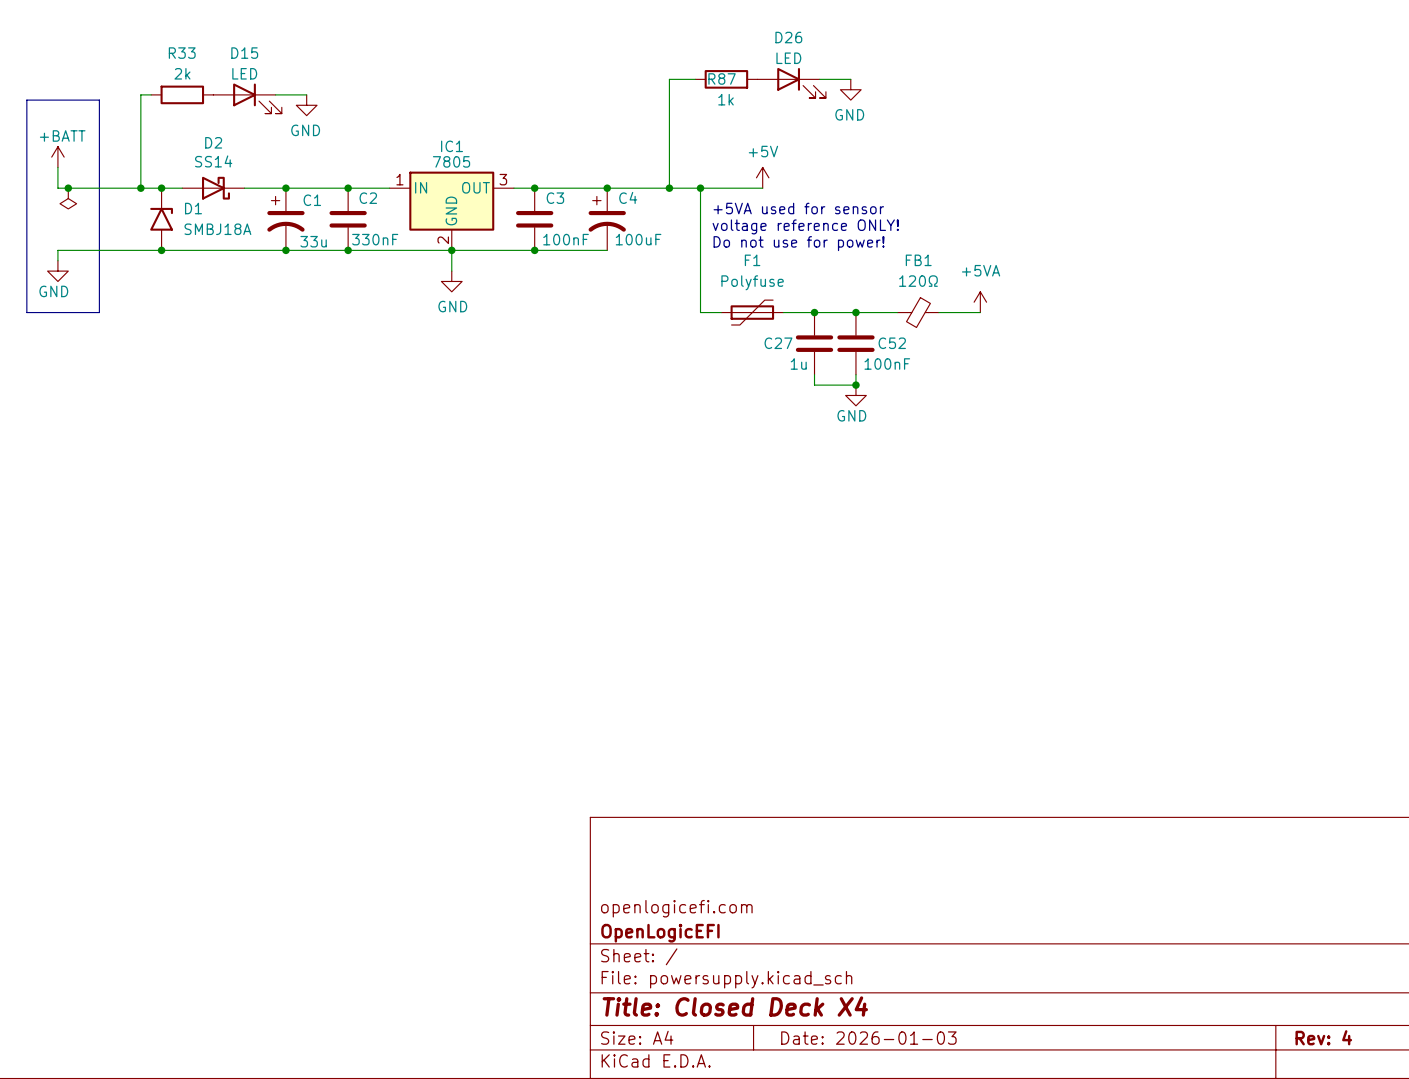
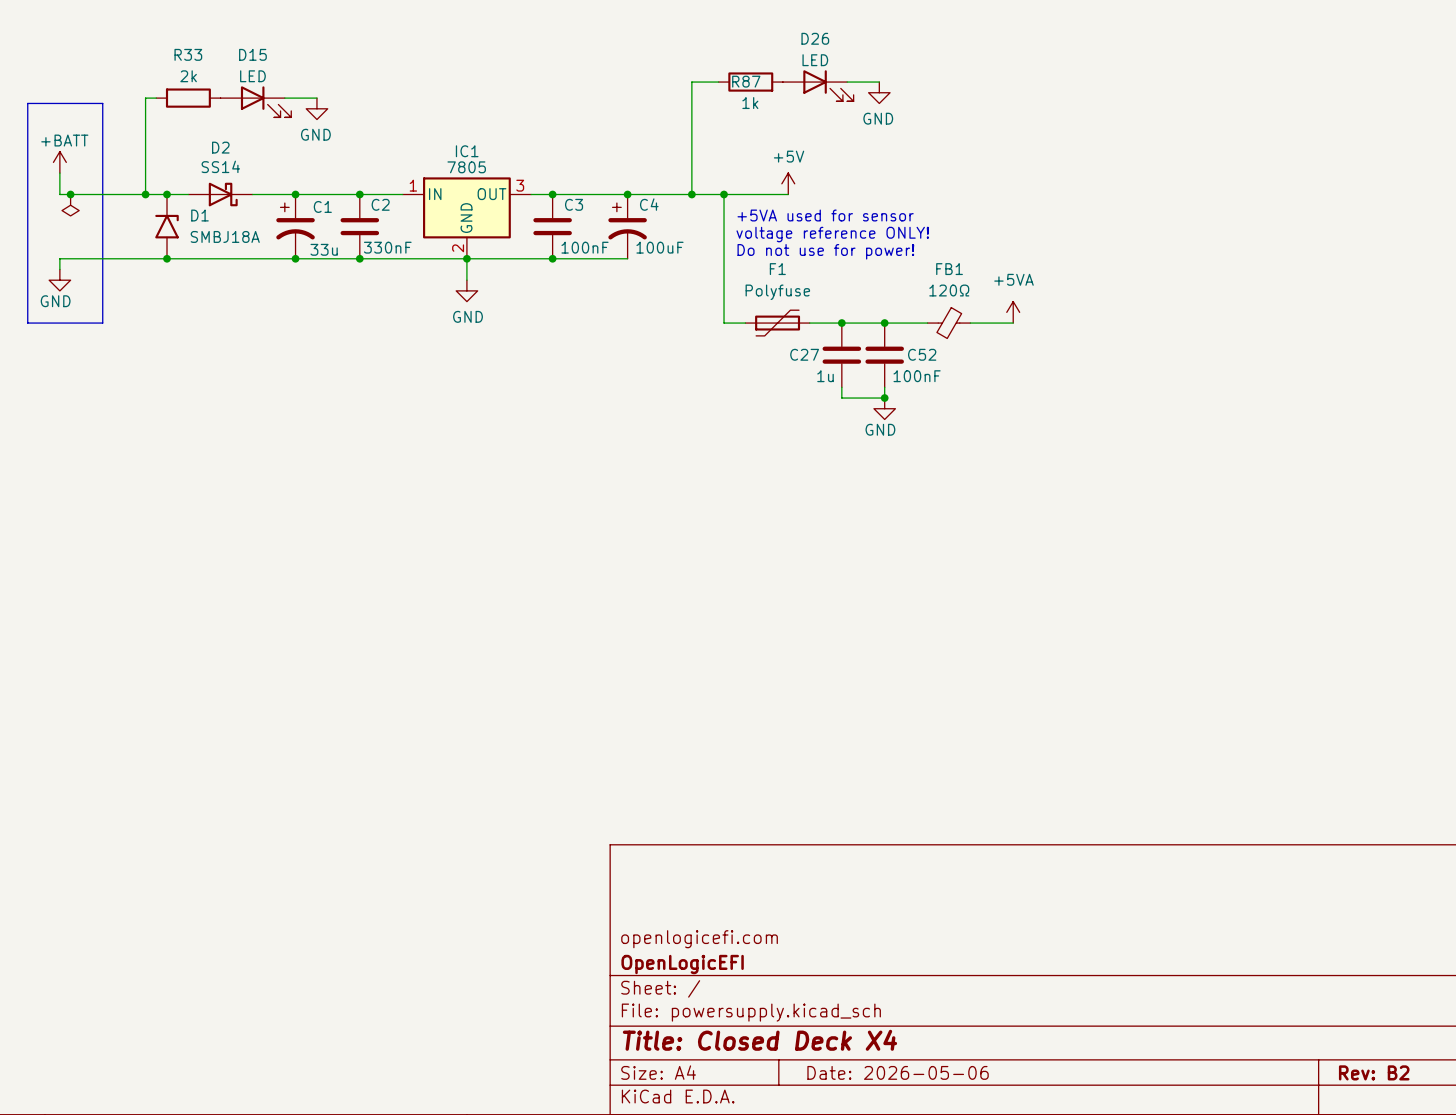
title block: Rev: 4 (1323, 1037) -> Rev: B2 (1374, 1072)
title block: Date: 2026-01-03 (868, 1038) -> Date: 2026-05-06 (898, 1072)

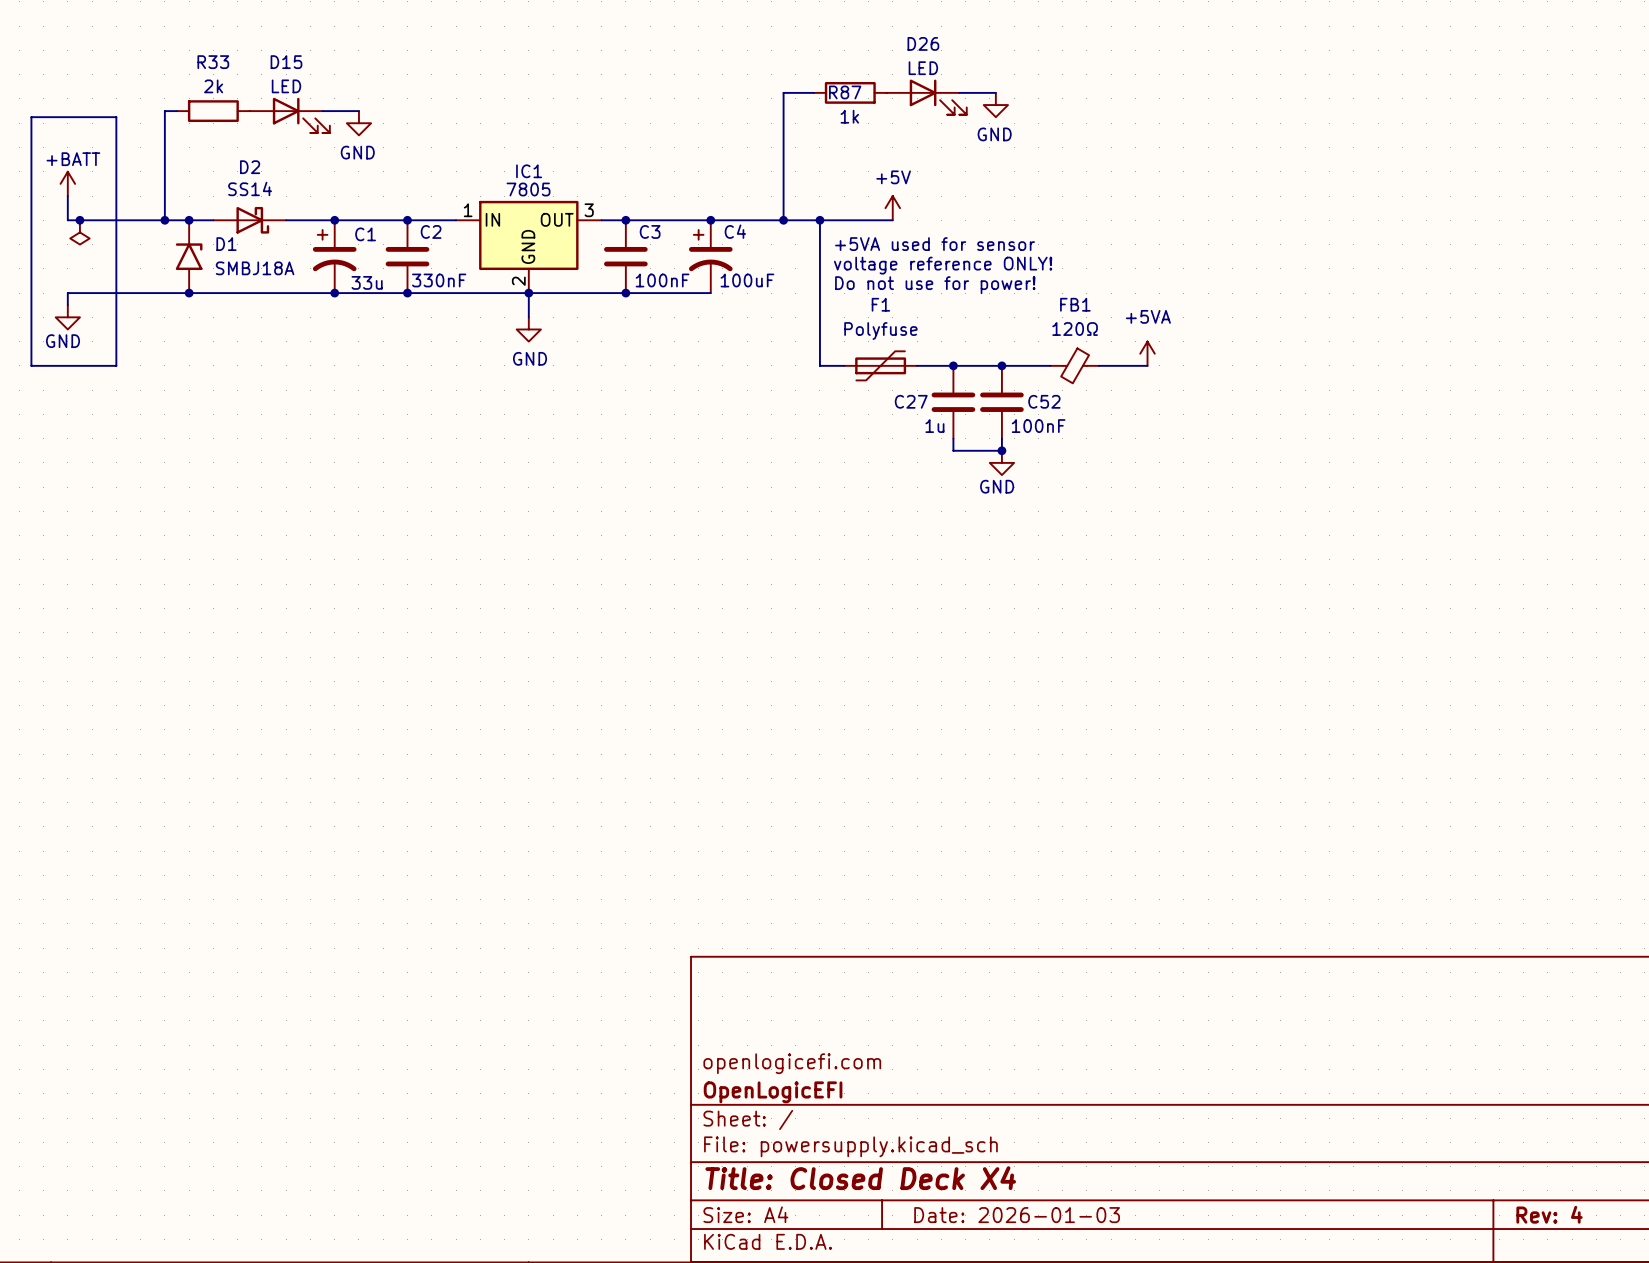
title block: Date: 2026-05-06 (898, 1072) -> Date: 2026-01-03 (1017, 1215)
title block: Rev: B2 (1374, 1072) -> Rev: 4 (1549, 1214)

